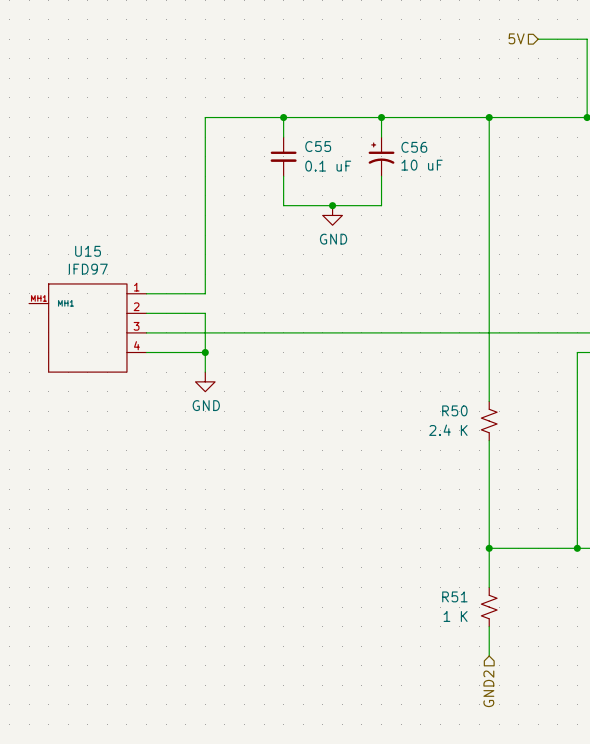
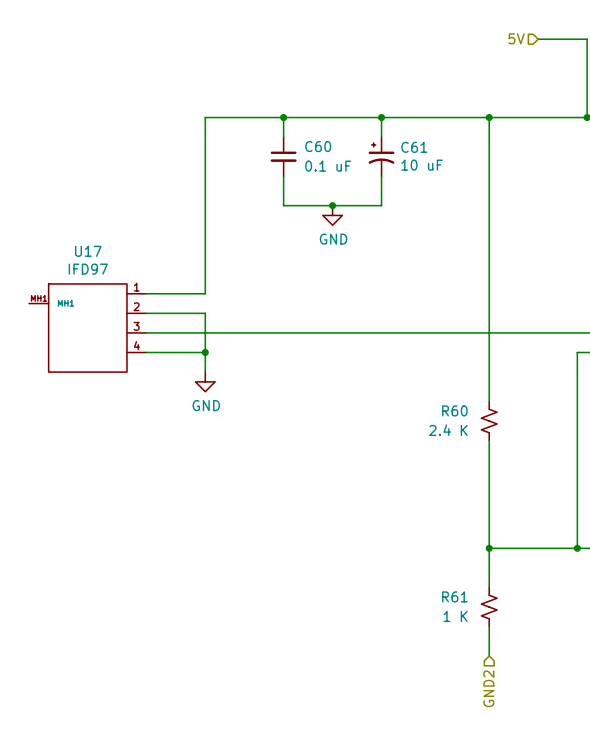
C55 name: C55 (318, 146) -> C60 (318, 146)
C56 name: C56 (414, 147) -> C61 (414, 147)
U15 name: U15 (88, 251) -> U17 (88, 251)
R50 name: R50 (454, 410) -> R60 (454, 410)
R51 name: R51 (454, 596) -> R61 (454, 596)

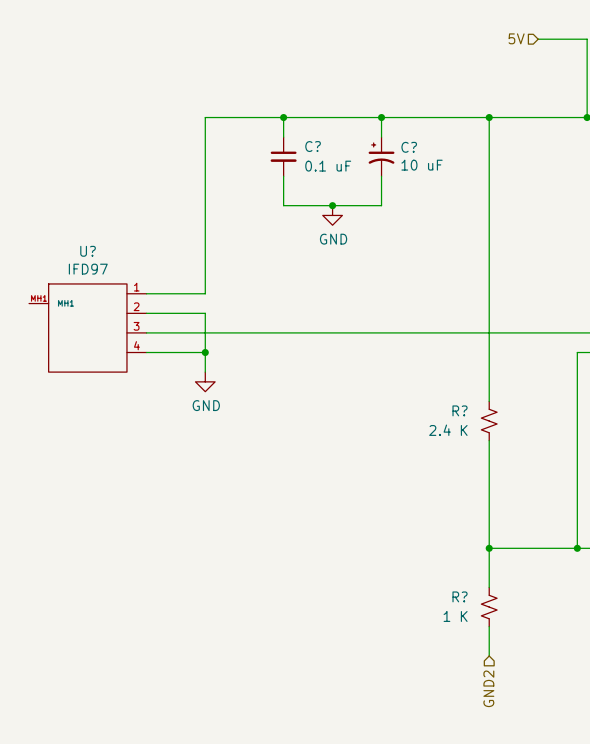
C60 name: C60 (318, 146) -> C? (313, 146)
C61 name: C61 (414, 147) -> C? (409, 147)
U17 name: U17 (88, 251) -> U? (88, 251)
R60 name: R60 (454, 410) -> R? (460, 410)
R61 name: R61 (454, 596) -> R? (460, 596)

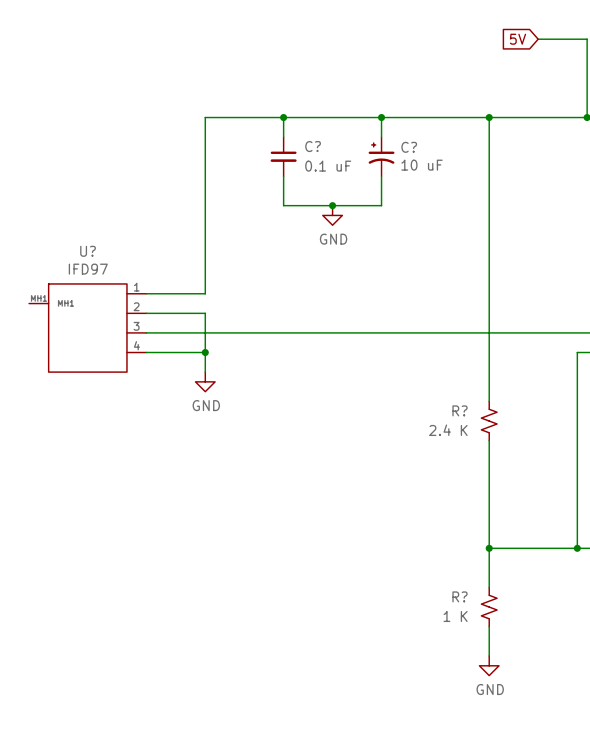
hierarchical label: 5V (516, 38) -> none
global label: none -> 5V (518, 39)
power symbol: none -> GND (489, 665)
hierarchical label: GND2 (488, 688) -> none

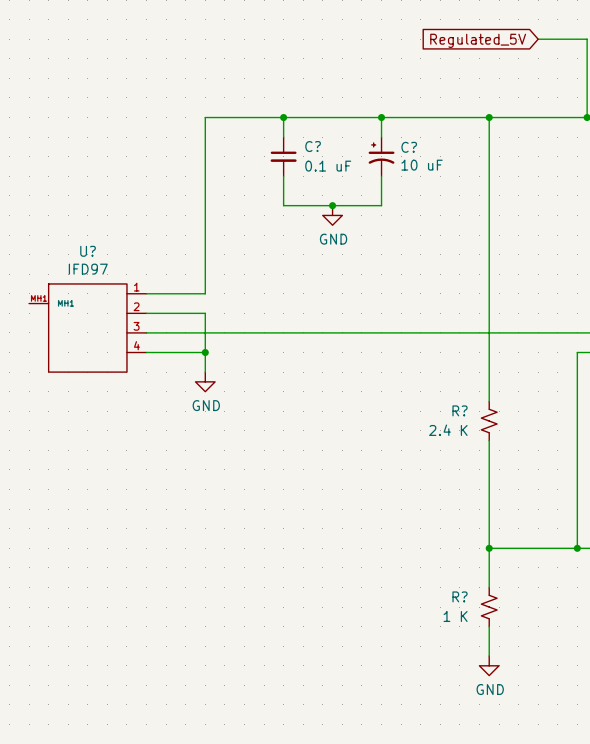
global label: 5V (518, 39) -> Regulated_5V (478, 40)

